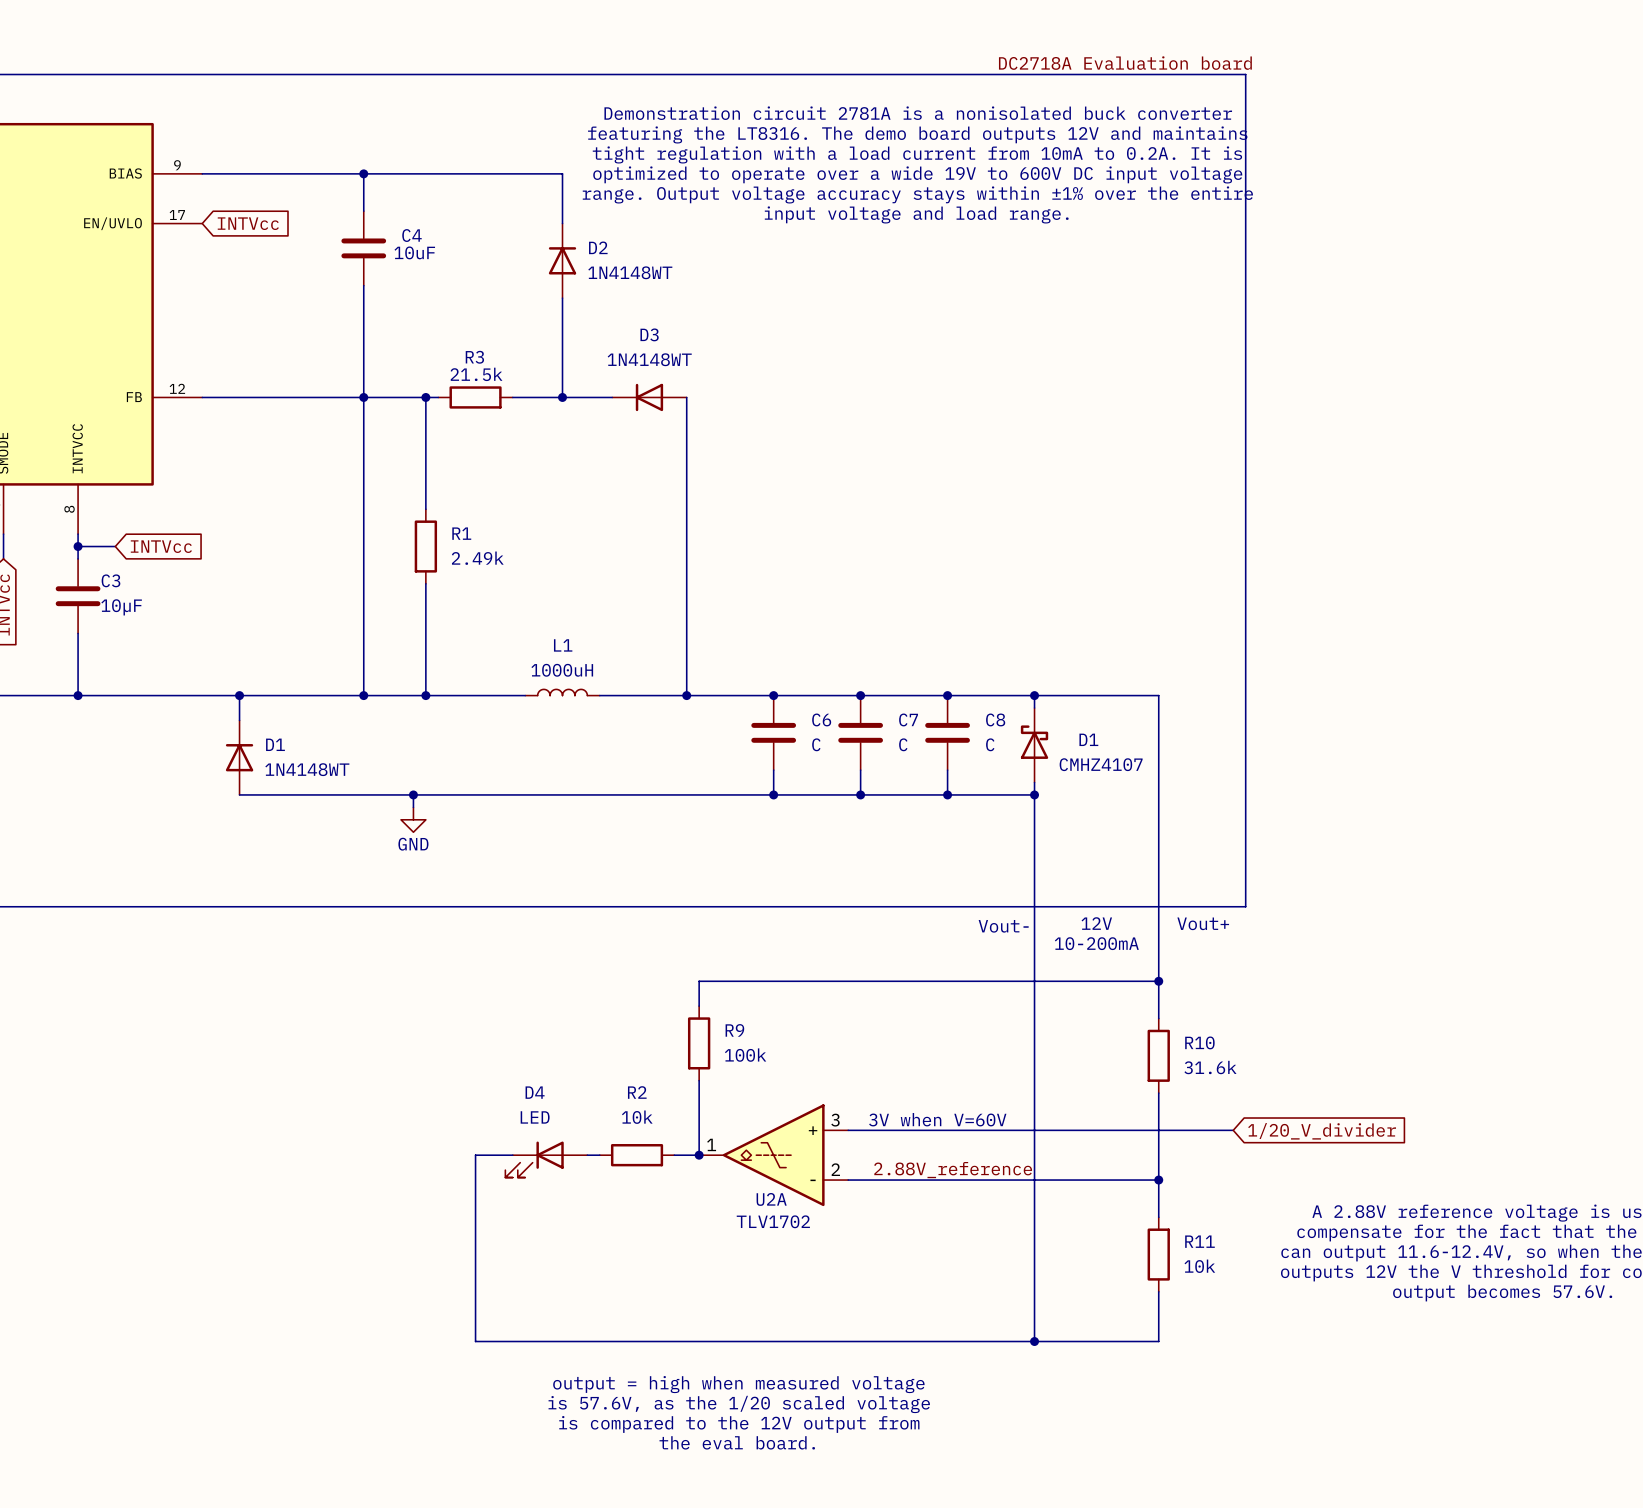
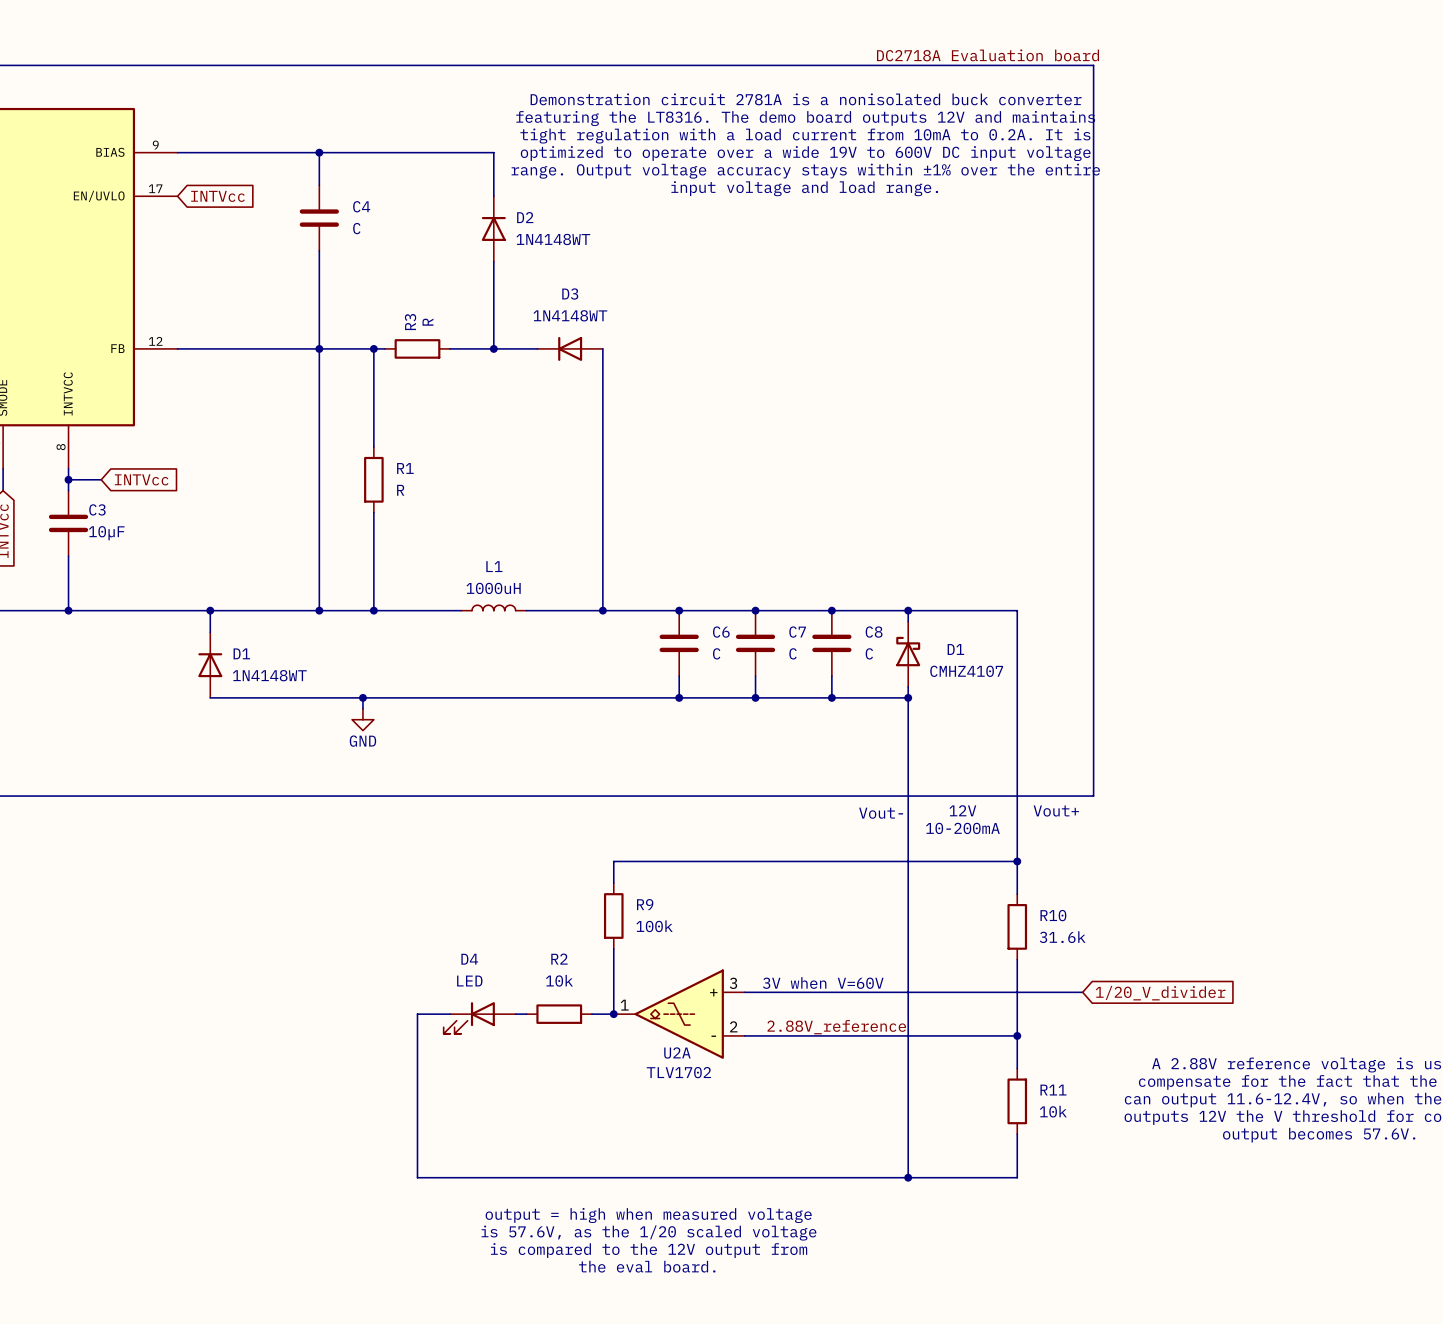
C4 value: 10uF (414, 252) -> C (356, 228)
R3 name rotation: 0° (474, 357) -> 90° counterclockwise (410, 322)
R3 value: 21.5k (476, 374) -> R (427, 322)
R1 value: 2.49k (477, 558) -> R (400, 490)

